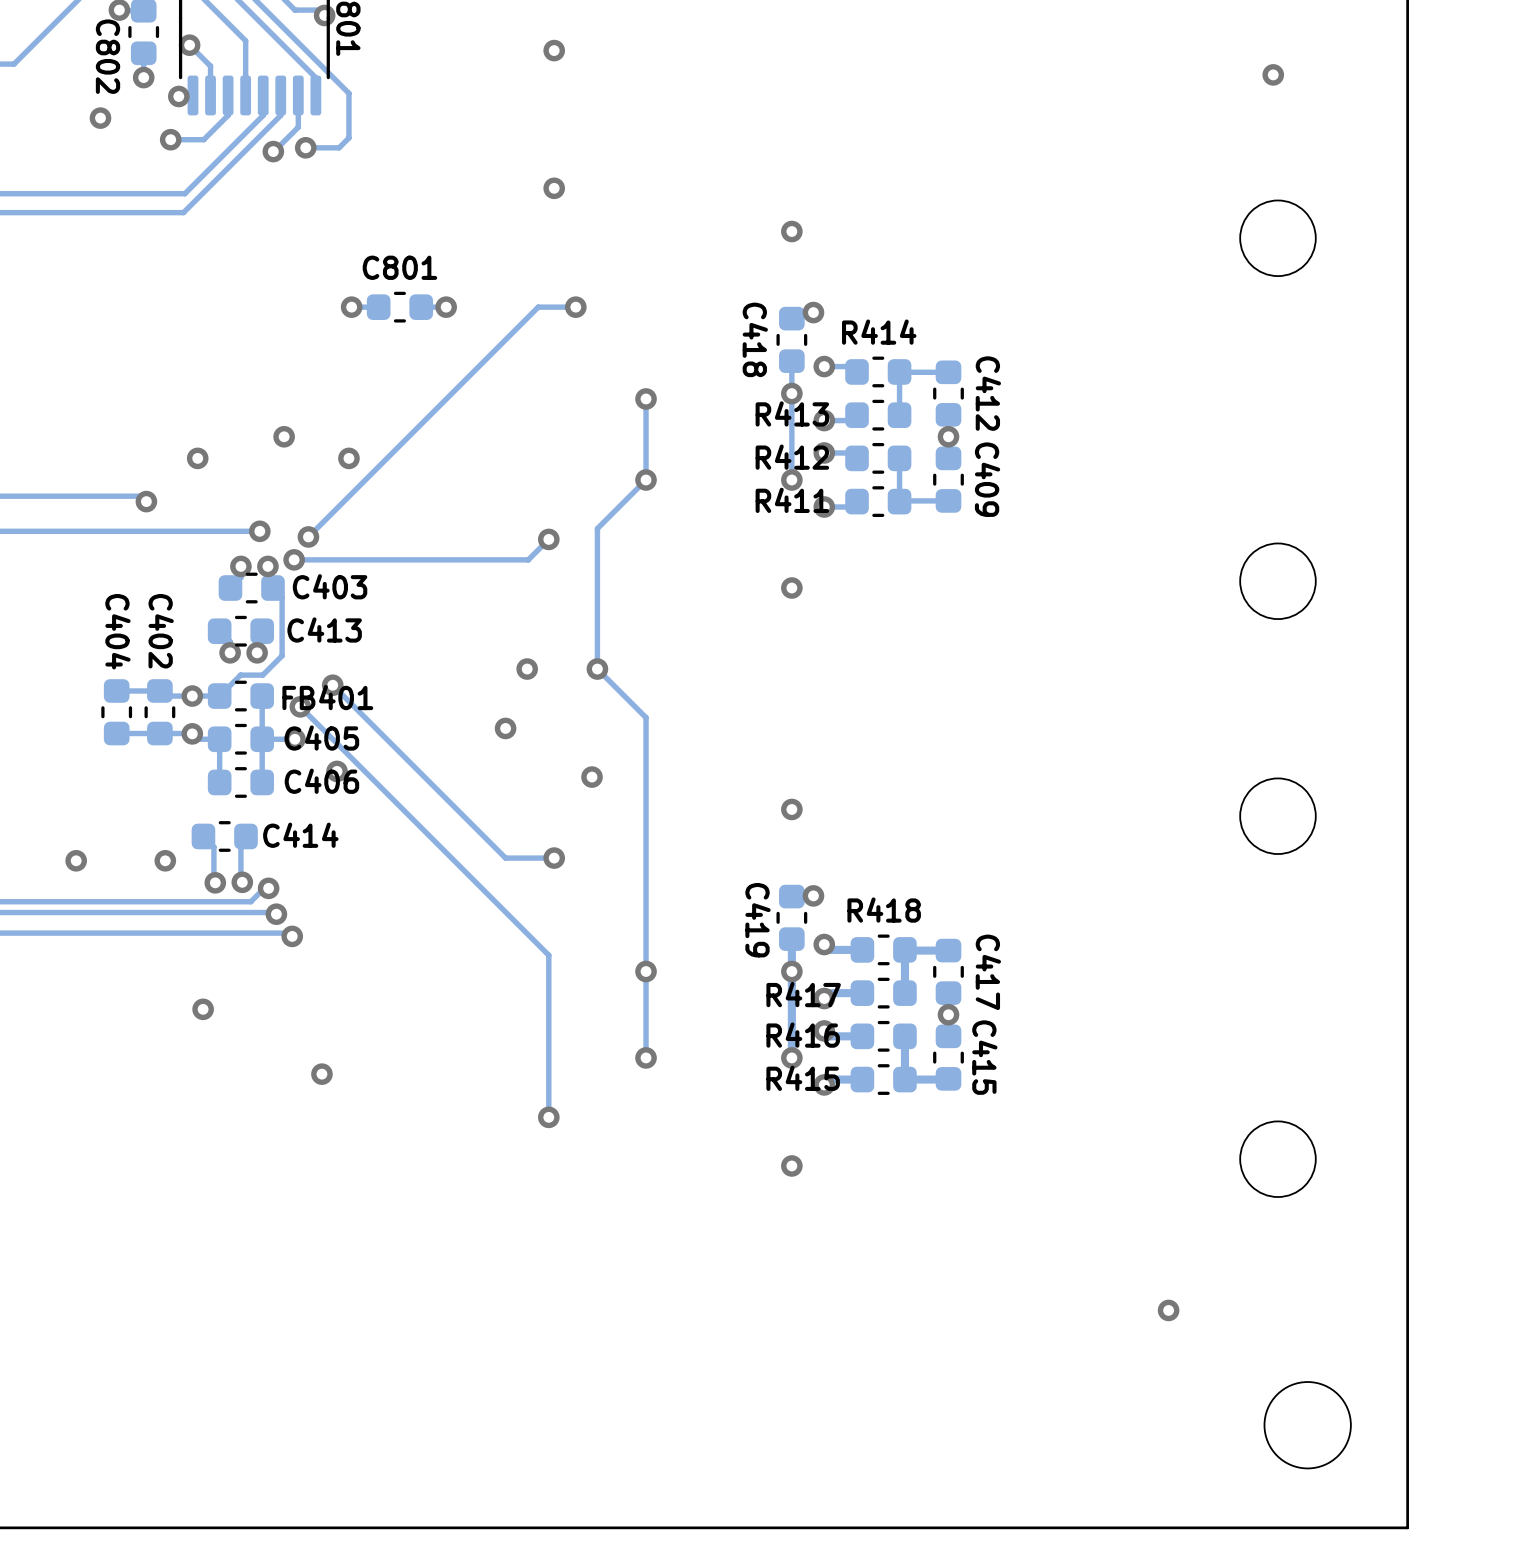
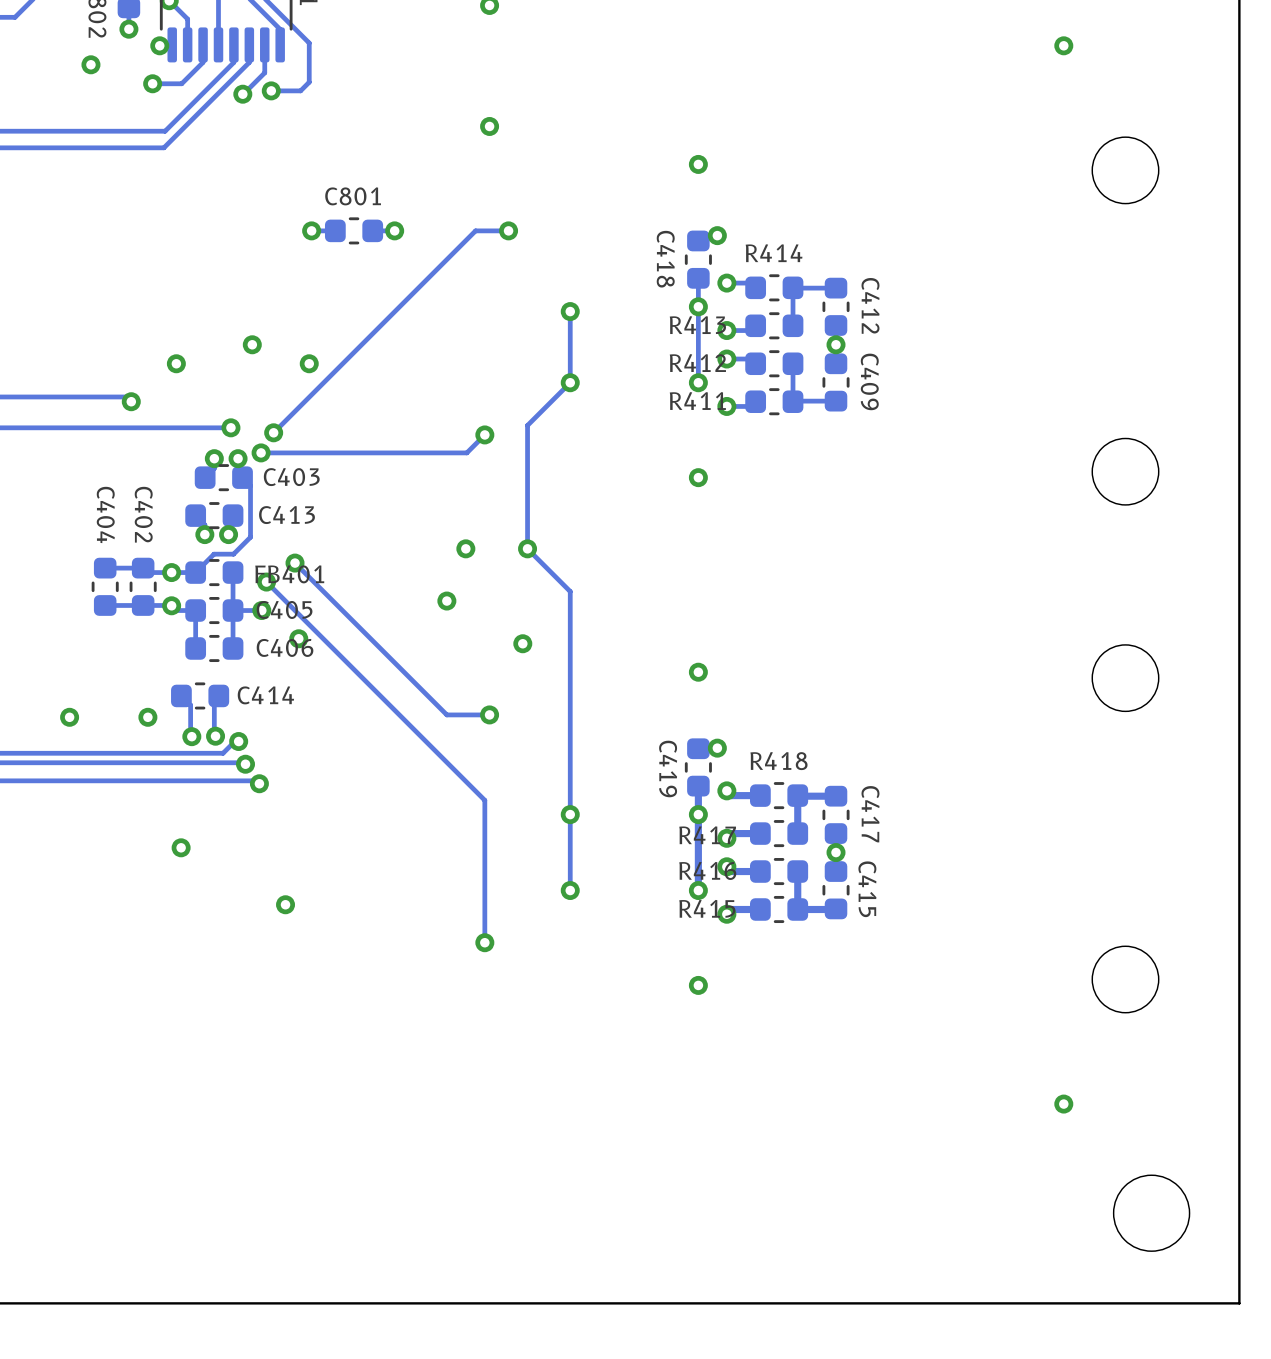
via position: (1273, 74) -> (1063, 45)
via position: (1168, 1310) -> (1063, 1104)

